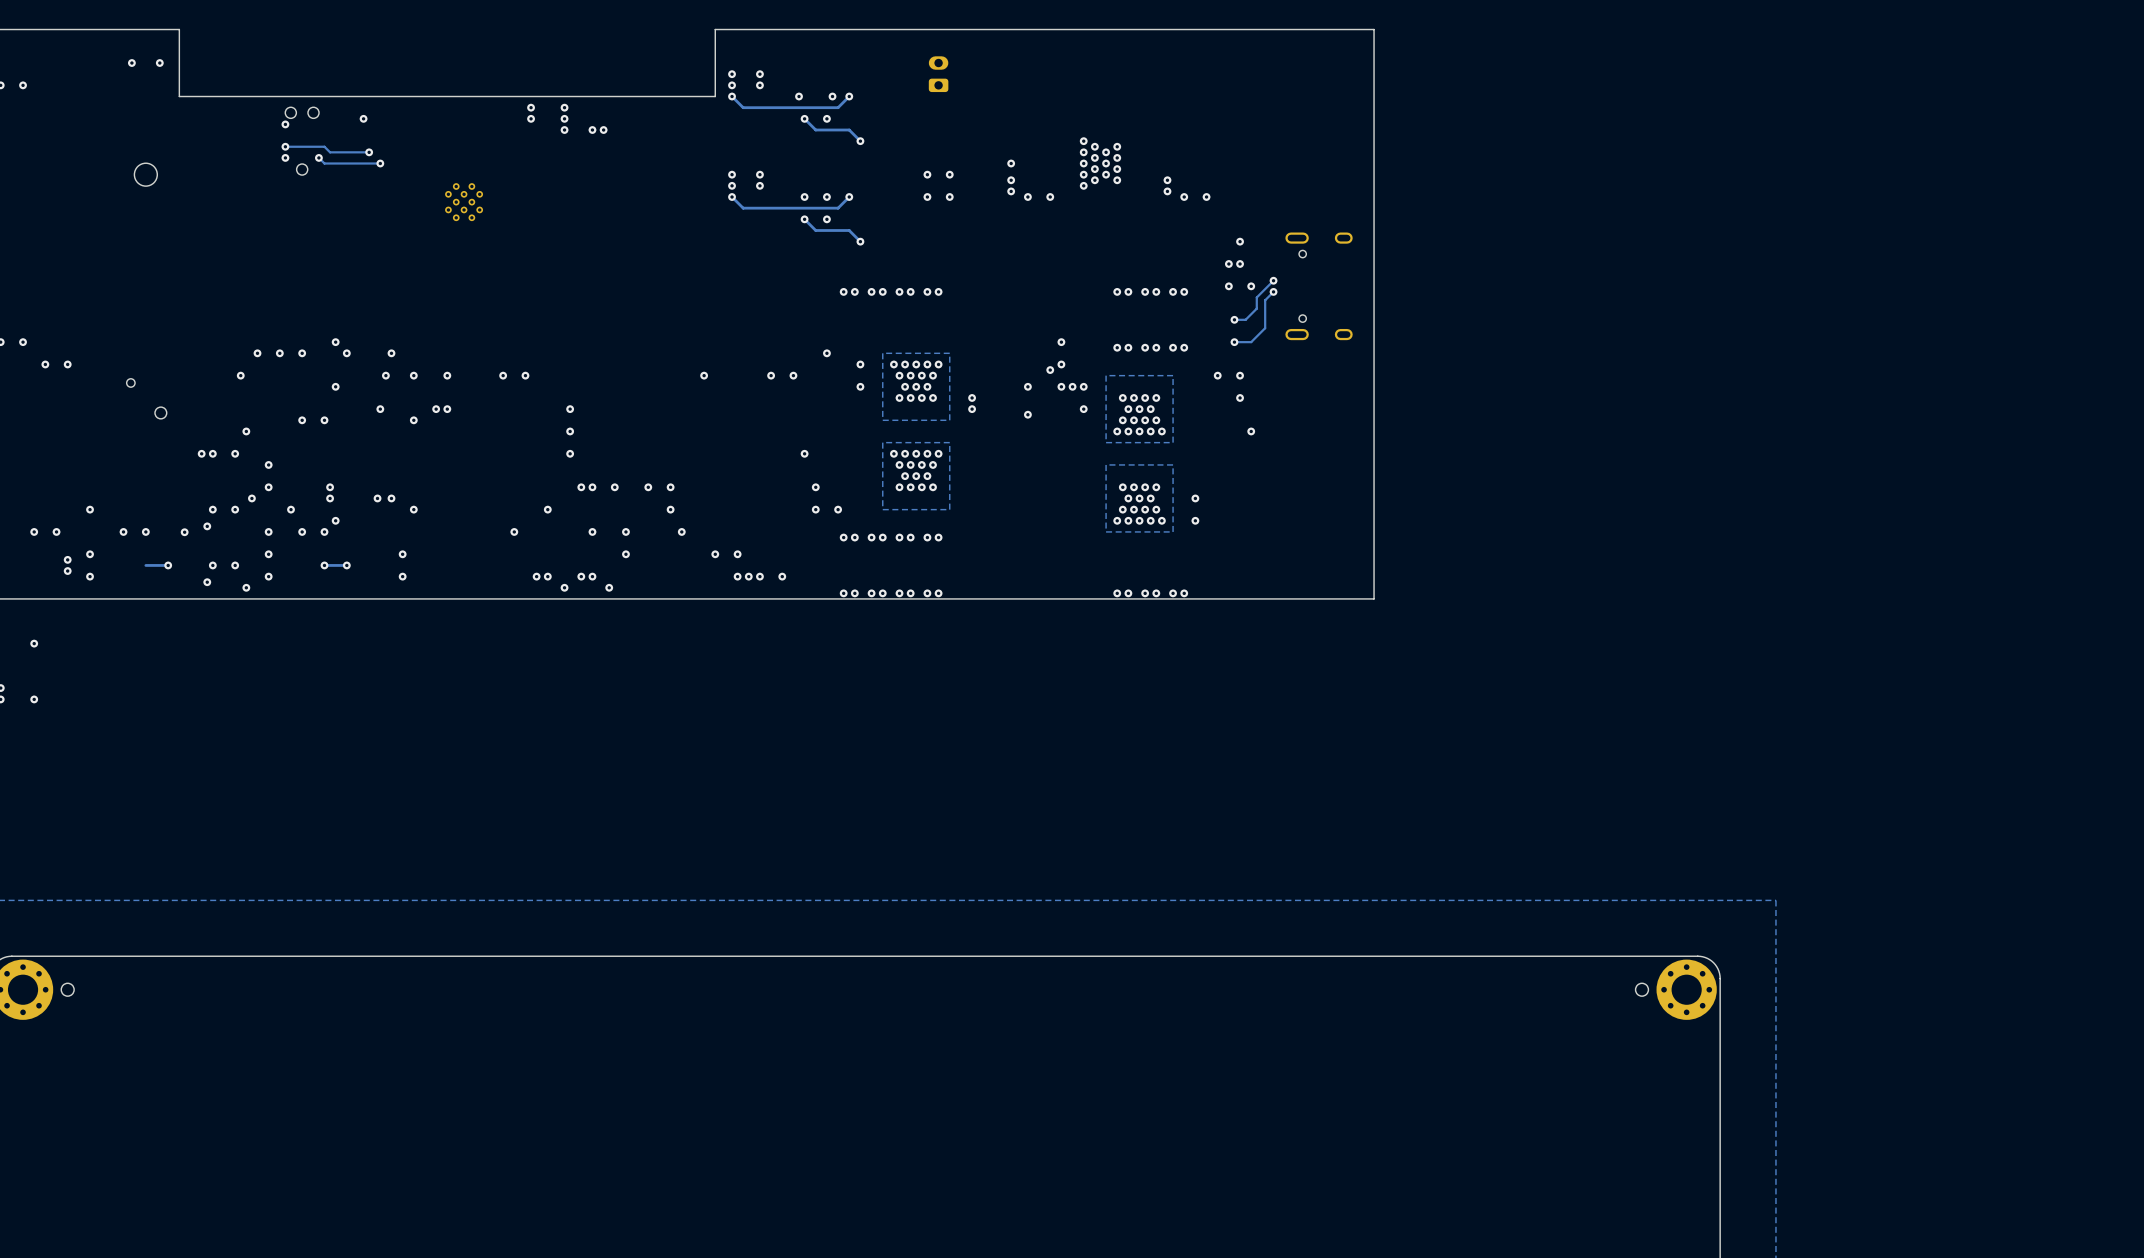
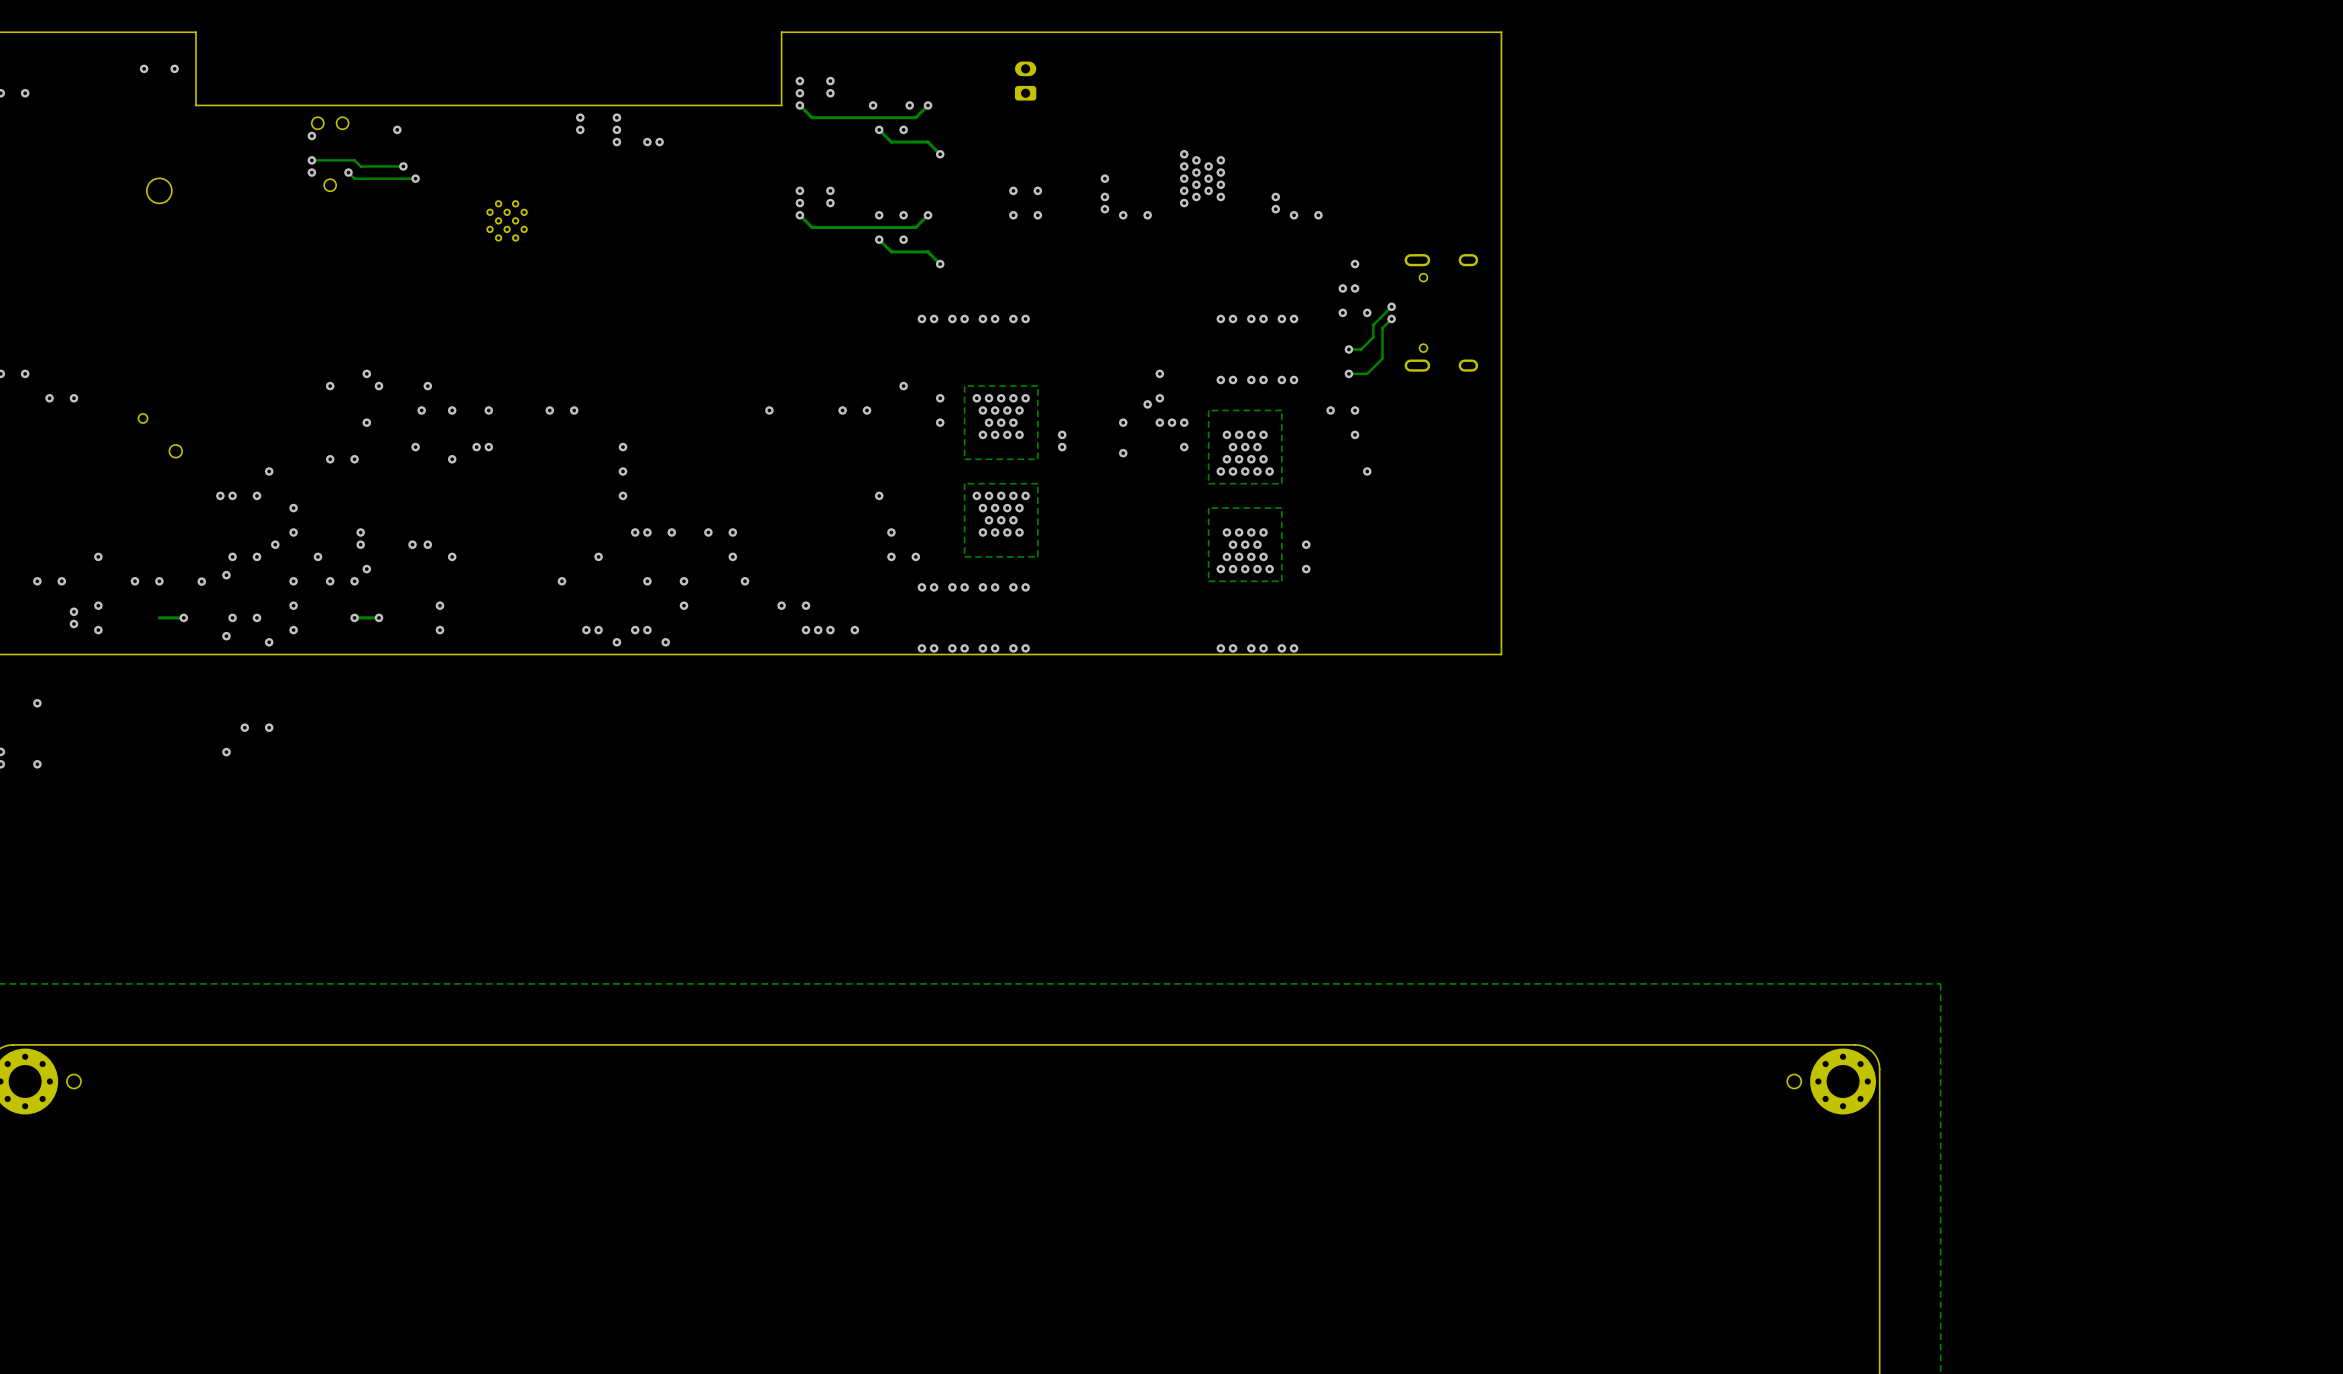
via: (257, 353) -> none
via: (279, 353) -> none
via: (240, 375) -> none
via: none -> (244, 727)
via: none -> (269, 727)
via: none -> (226, 752)

